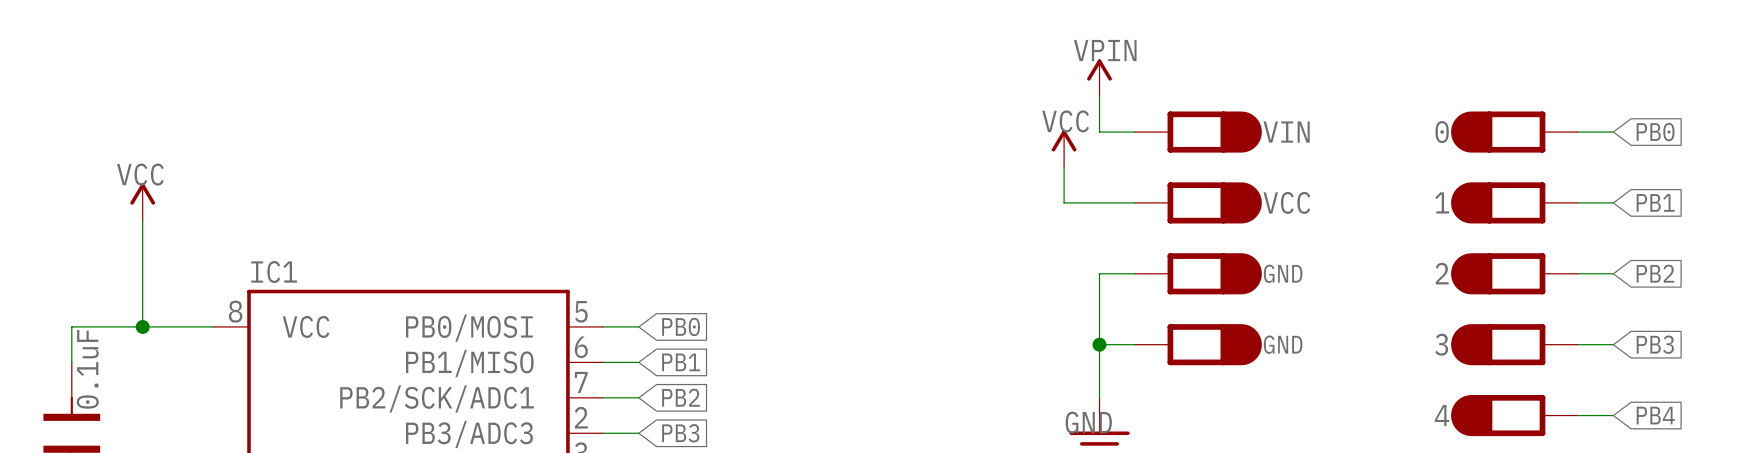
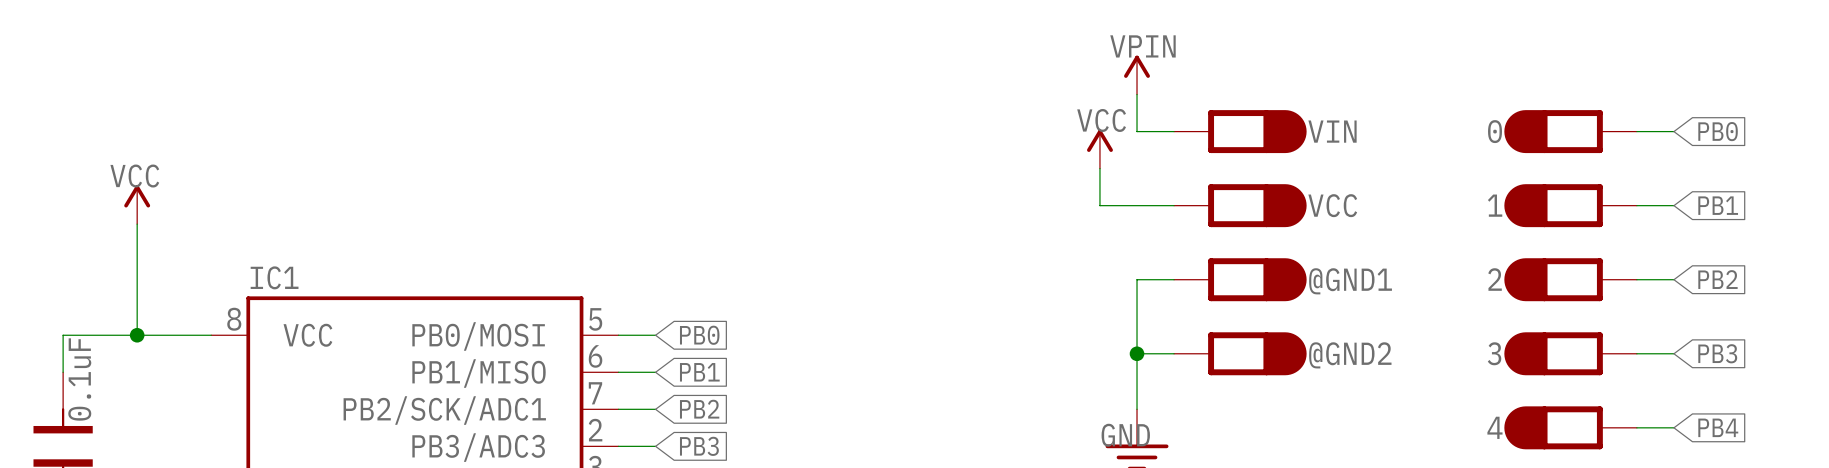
text: GND (1283, 273) -> none
@GND1 name: none -> @GND1 (1350, 281)
text: GND (1283, 344) -> none
@GND2 name: none -> @GND2 (1350, 355)

